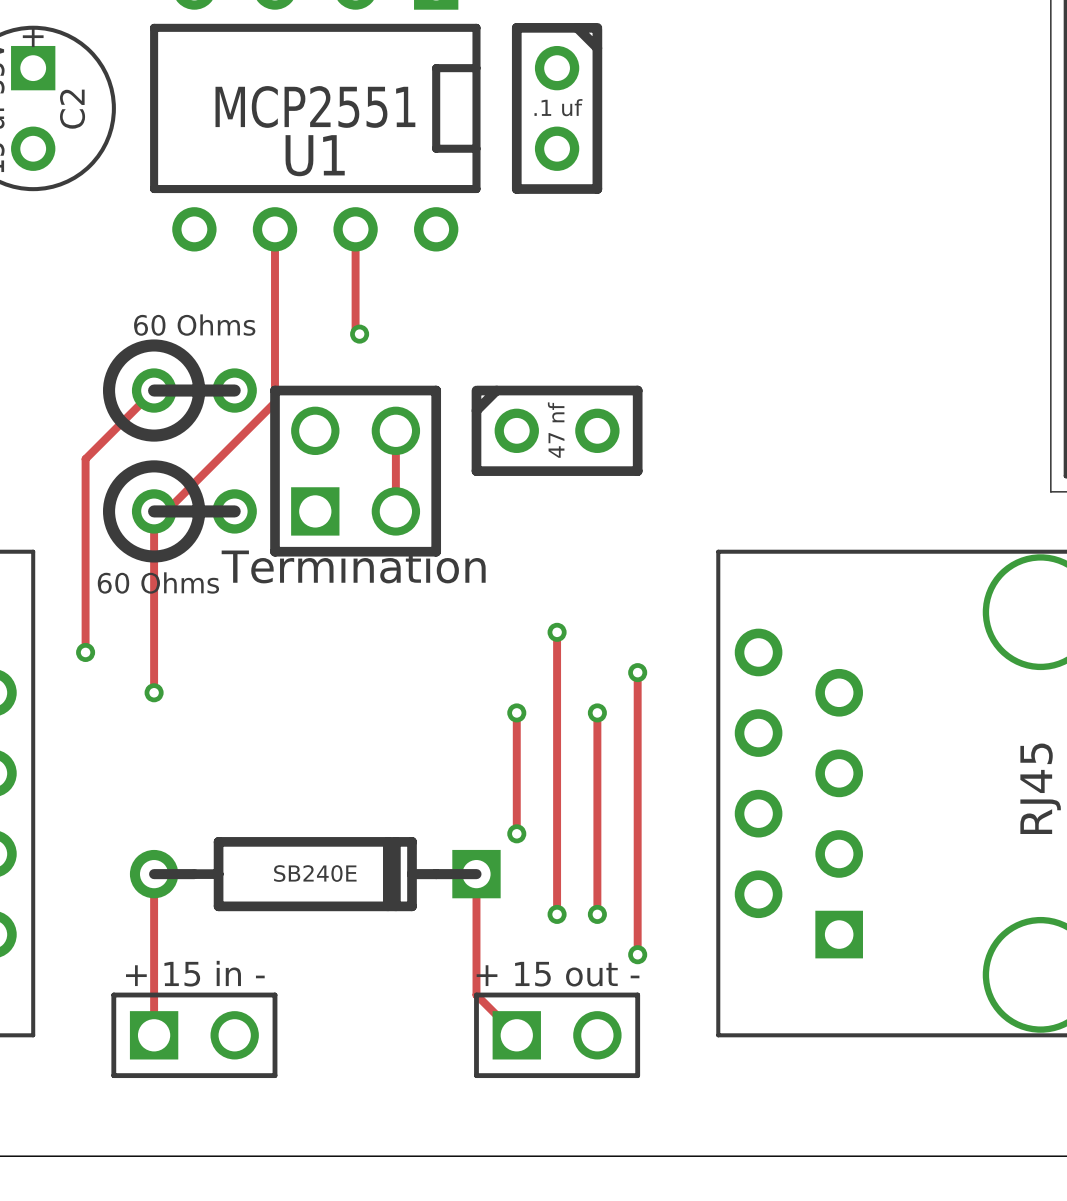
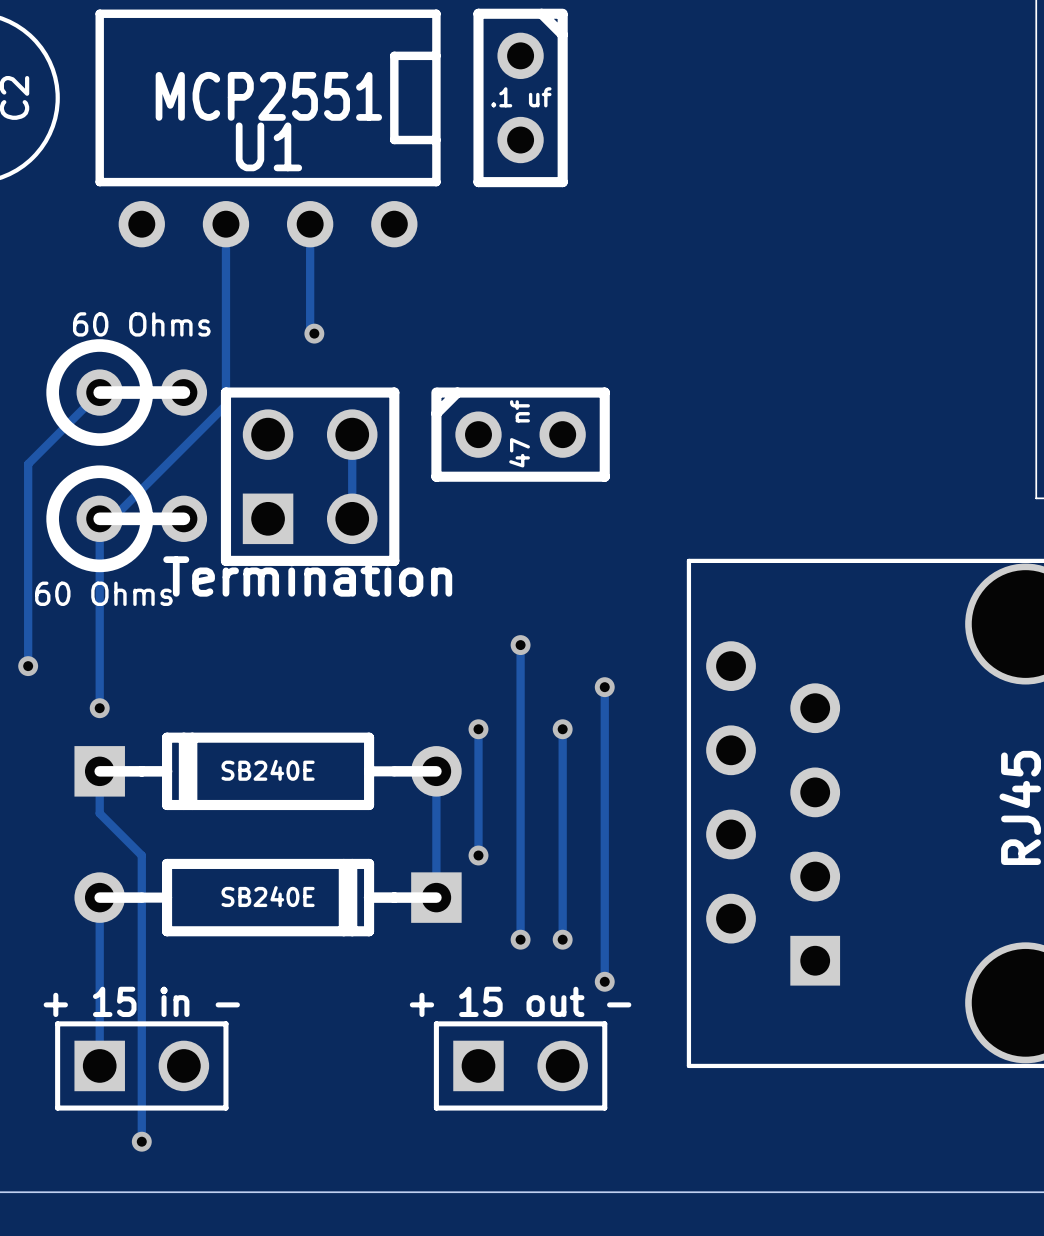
track: none -> (99, 771) (99, 813) (141, 855) (141, 1141)
part: none -> SB240E (268, 771)
track: (476, 874) (476, 995) (516, 1035) -> (436, 897) (436, 771)
via: none -> (141, 1141)

